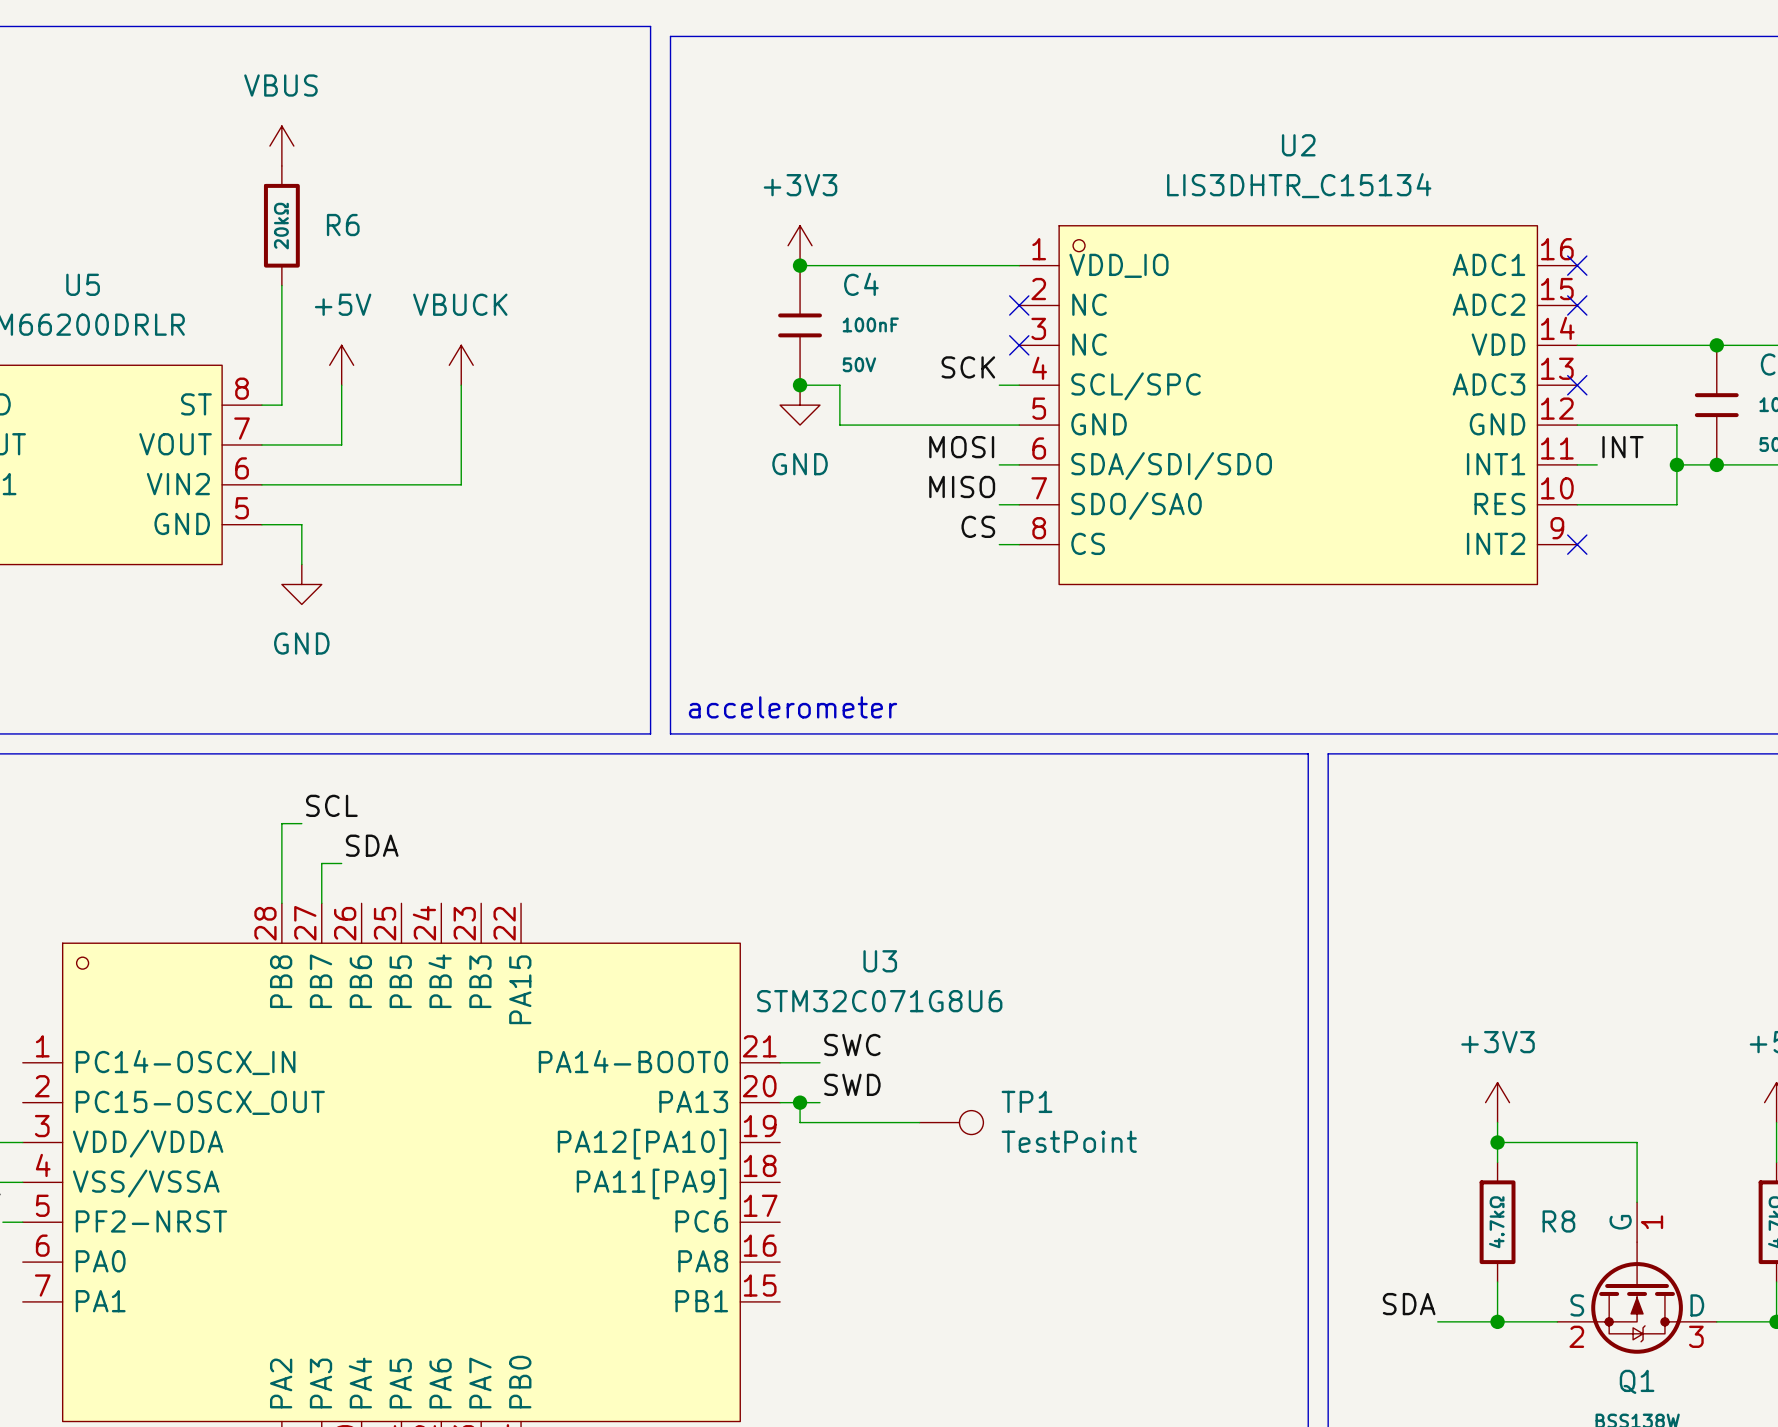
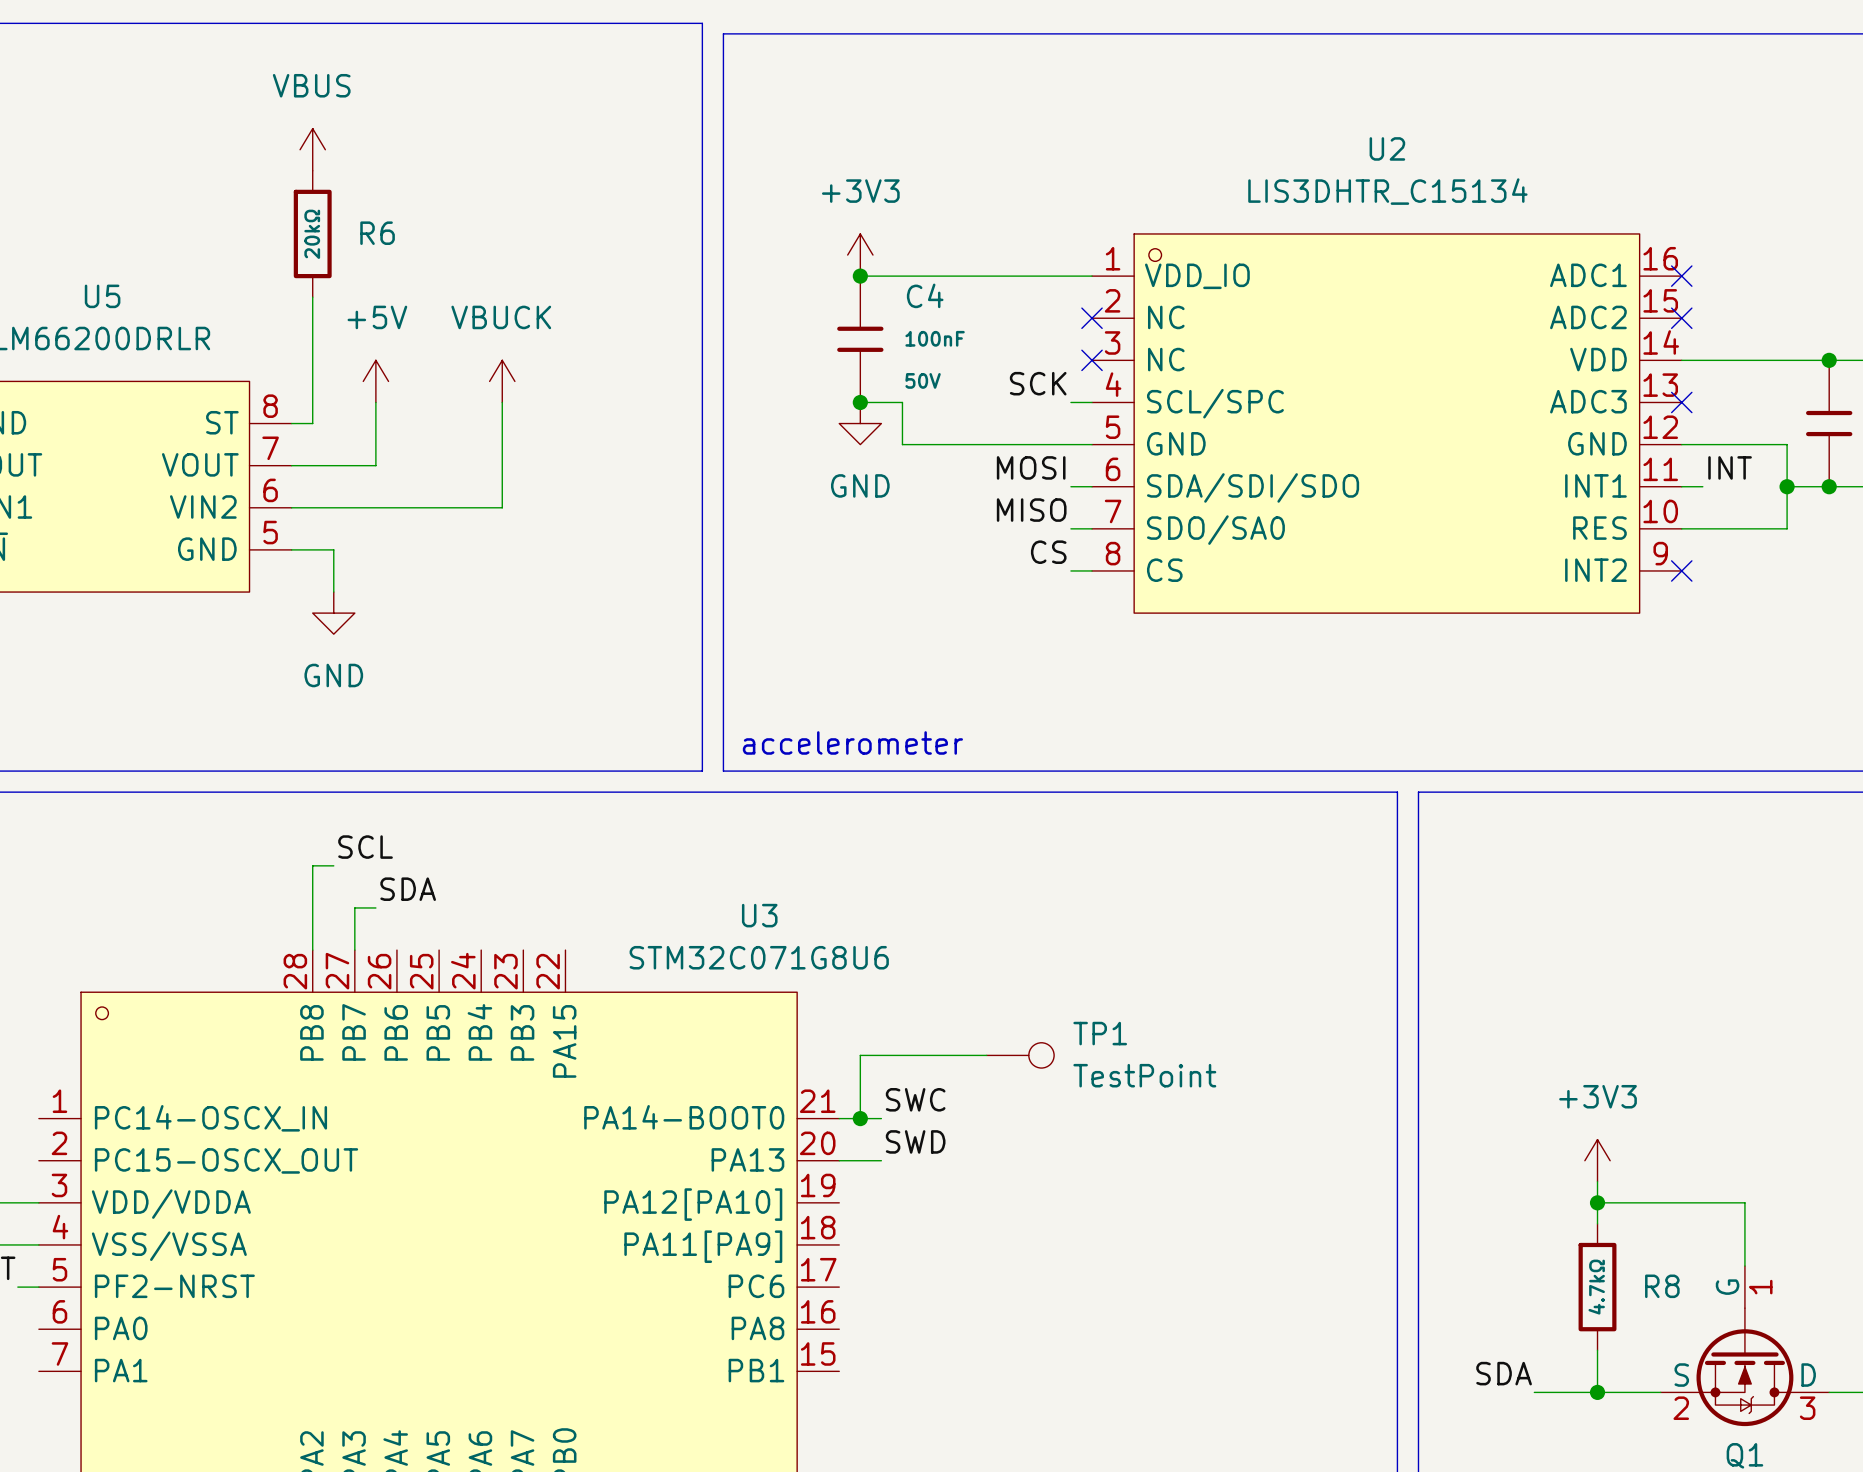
U3 name position: U3 (880, 961) -> U3 (759, 915)
U3 value position: STM32C071G8U6 (879, 1001) -> STM32C071G8U6 (759, 957)
wire: none -> (986, 1055) (860, 1055) (860, 1118)
wire: (800, 1102) (800, 1122) (919, 1122) -> none
junction position: (800, 1102) -> (860, 1118)
TP1 position: (951, 1122) -> (1020, 1055)

